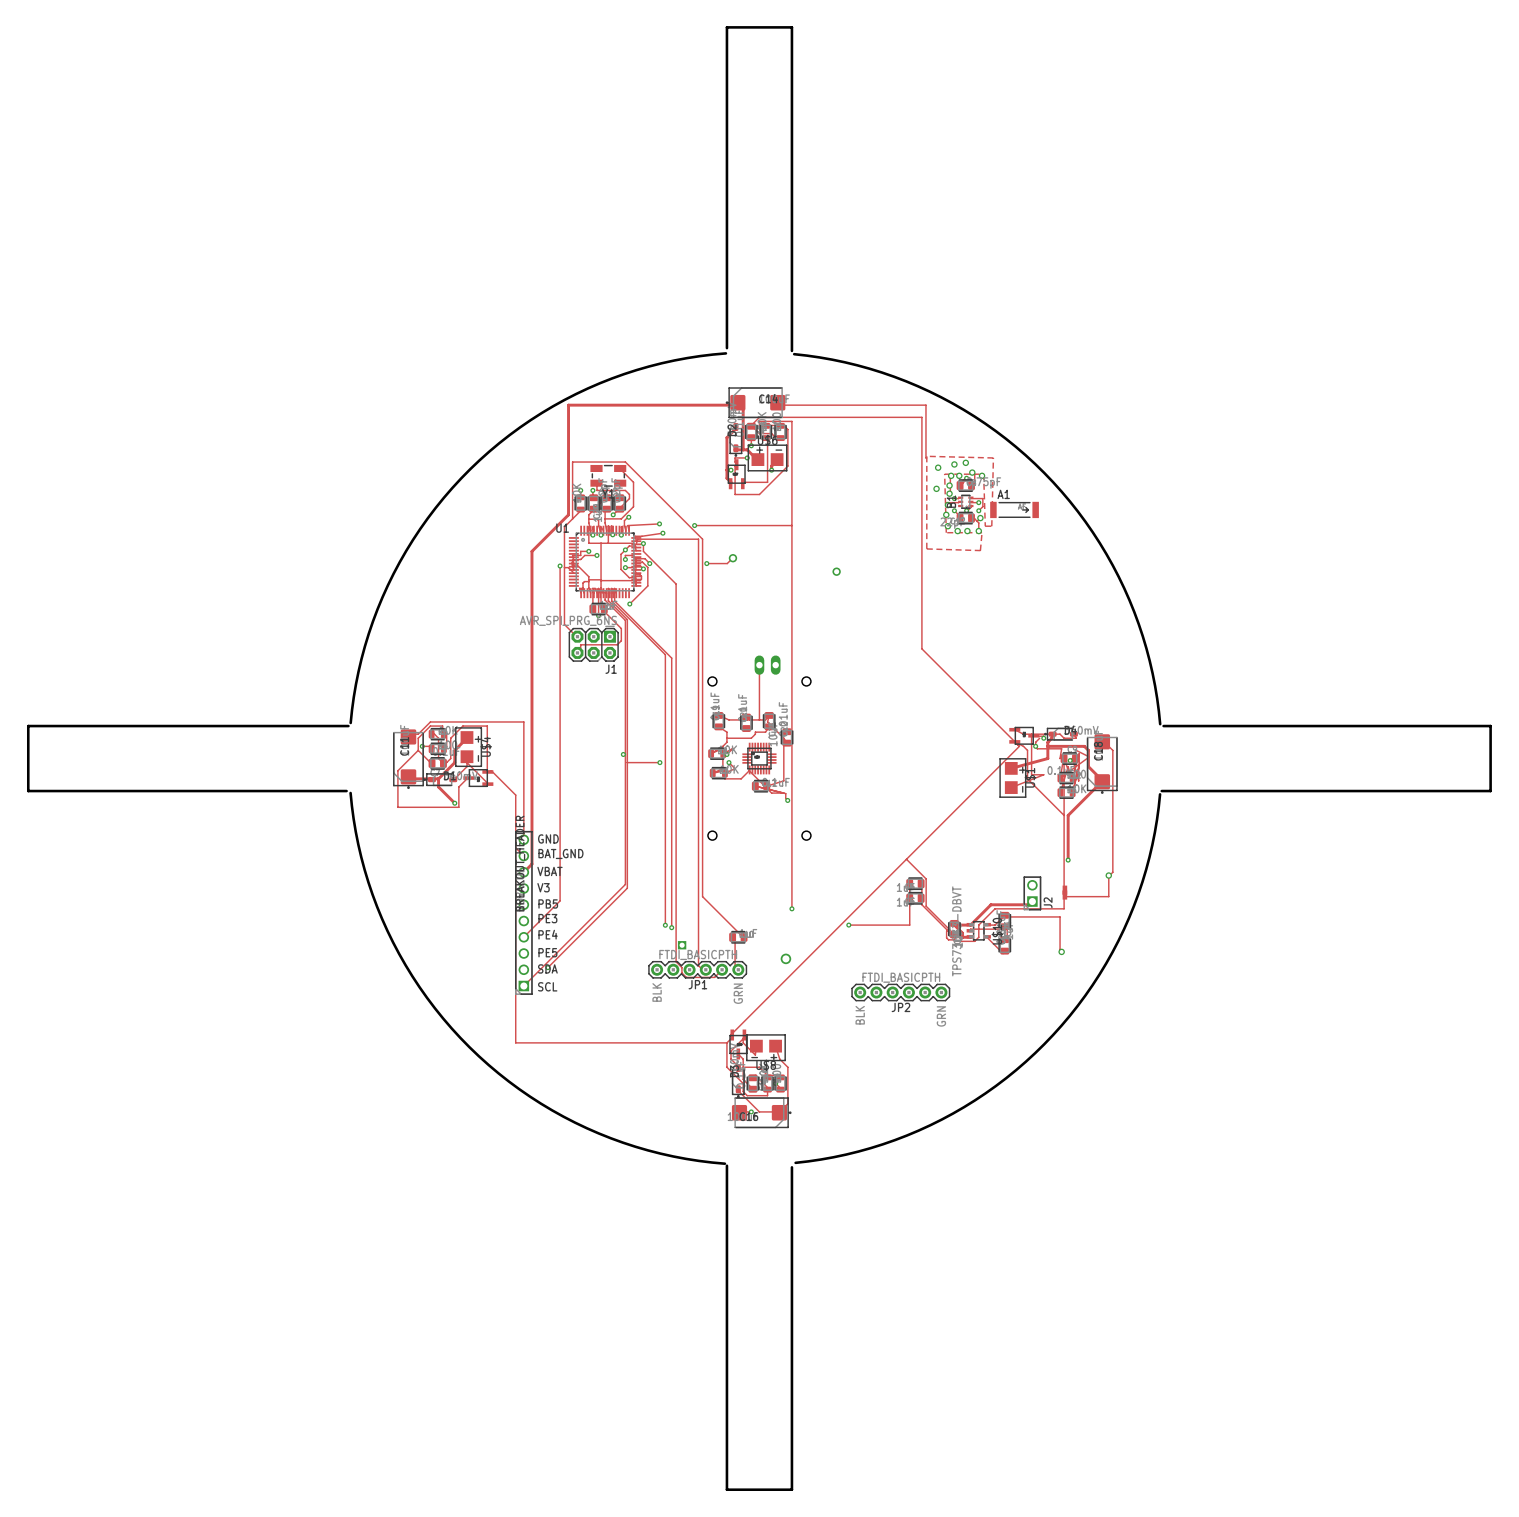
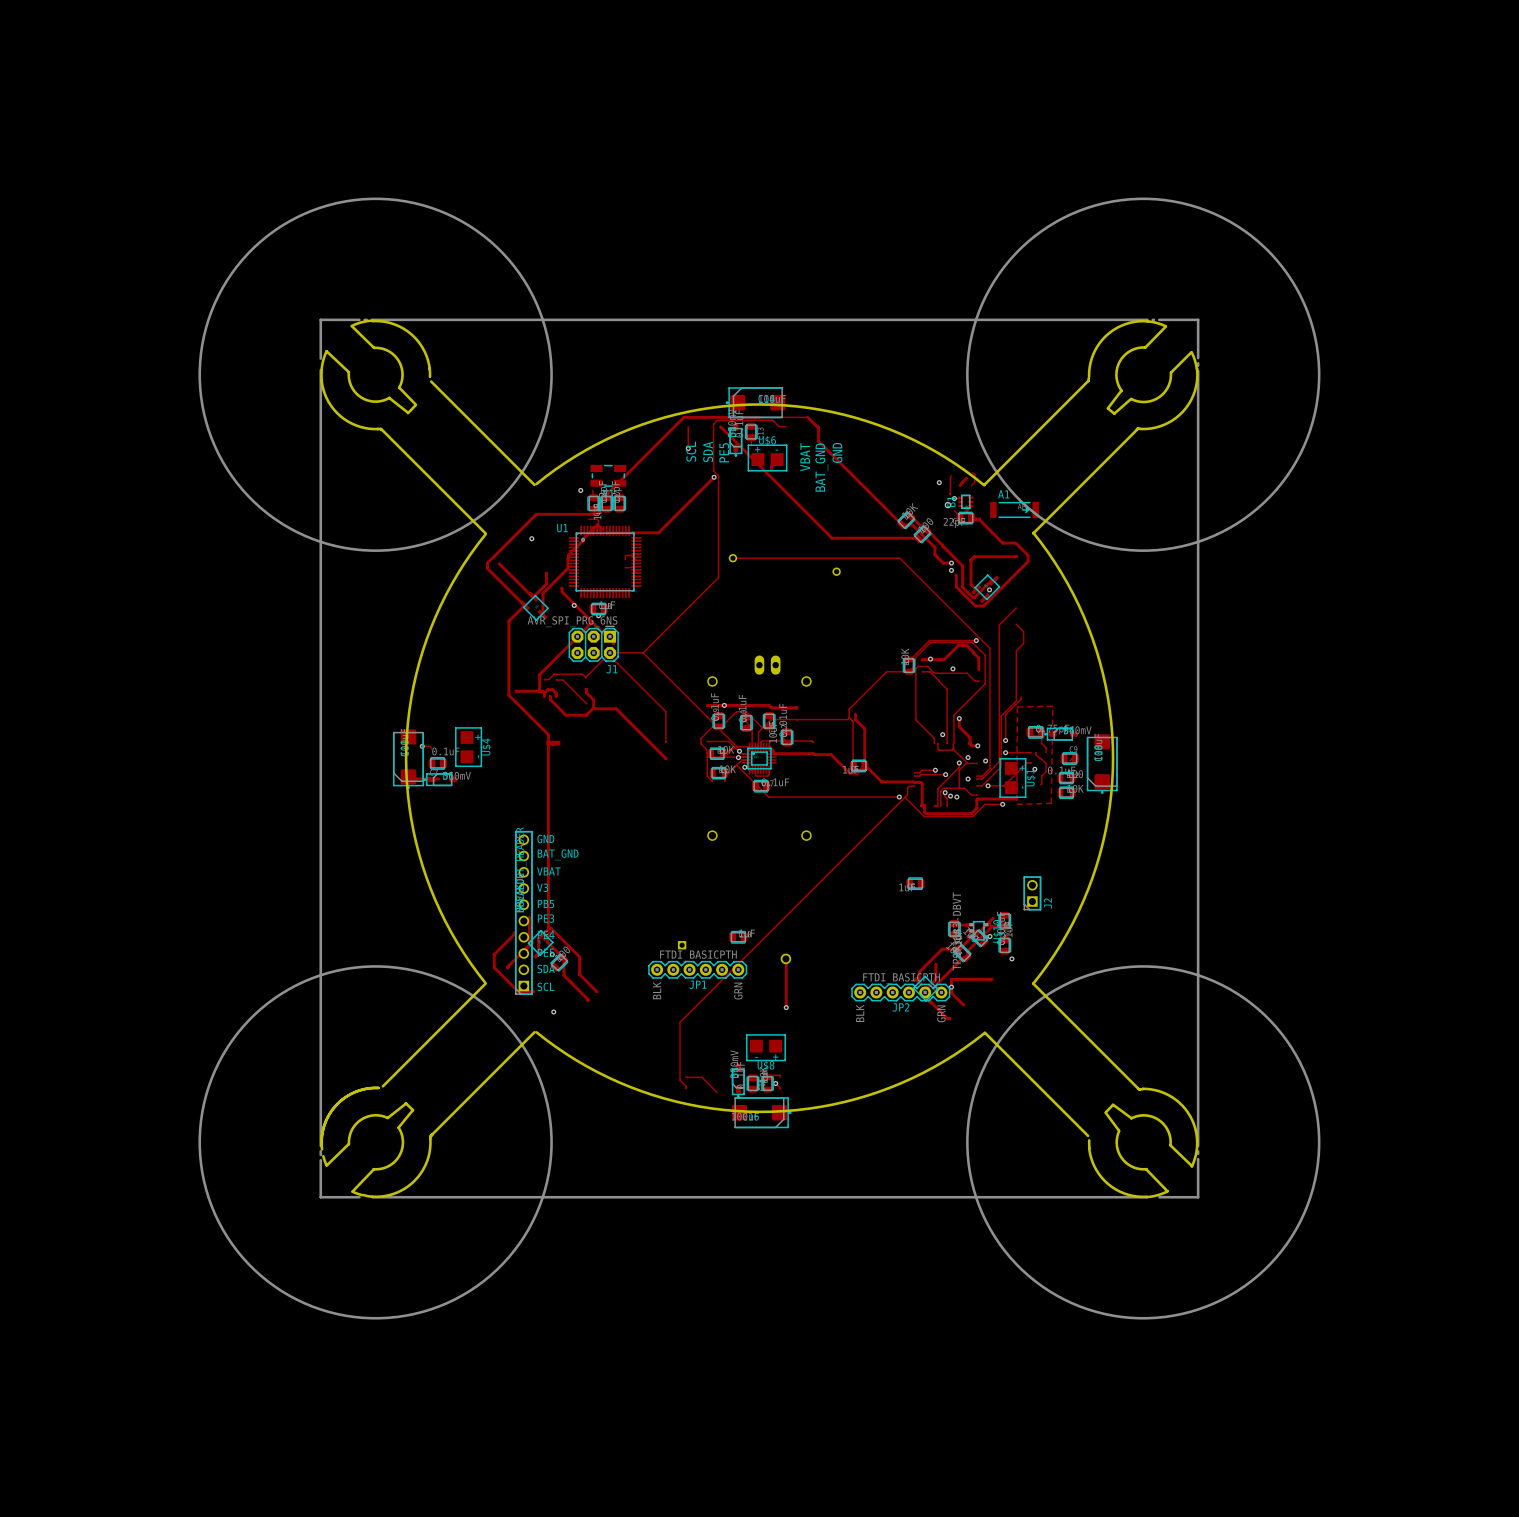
drawing: none -> [198, 197, 553, 552]
drawing: none -> [966, 197, 1321, 552]
line: none -> (359, 319) (320, 319) (320, 358)
line: none -> (364, 319) (366, 319)
line: none -> (371, 319) (1147, 319)
line: none -> (1152, 319) (1154, 319)
line: none -> (1159, 319) (1198, 319) (1198, 358)
board edge: none -> (372, 320) (351, 325)
board edge: none -> (372, 321) (390, 323) (410, 333) (422, 347) (429, 369)
board edge: none -> (1147, 321) (1165, 326)
board edge: none -> (1147, 321) (1125, 324) (1106, 335) (1093, 354) (1089, 376)
board edge: none -> (351, 326) (374, 347)
board edge: none -> (1165, 326) (1145, 347)
board edge: none -> (373, 347) (389, 351) (398, 360) (402, 372) (399, 387)
board edge: none -> (1145, 347) (1129, 351) (1119, 361) (1116, 378) (1121, 390)
board edge: (726, 348) (726, 27) (791, 27) (791, 350) -> none
board edge: none -> (326, 351) (348, 372) (350, 385) (358, 395) (373, 401) (389, 397)
board edge: none -> (326, 351) (321, 369)
board edge: none -> (1191, 352) (1171, 372)
board edge: none -> (1191, 352) (1196, 369)
board edge: (725, 353) (661, 363) (624, 374) (587, 388) (530, 419) (499, 443) (470, 469) (427, 518) (406, 550) (387, 585) (364, 646) (355, 684) (350, 722) -> none
board edge: (794, 354) (832, 359) (869, 368) (929, 391) (963, 409) (995, 431) (1044, 472) (1069, 501) (1092, 532) (1124, 588) (1138, 624) (1149, 660) (1160, 724) -> none
line: none -> (1198, 363) (1198, 365)
board edge: none -> (429, 368) (430, 376)
board edge: none -> (1197, 368) (1194, 391) (1182, 411) (1163, 424) (1140, 429)
line: none -> (320, 370) (320, 1146)
board edge: none -> (321, 370) (321, 381)
line: none -> (1198, 370) (1198, 1146)
board edge: none -> (1170, 372) (1168, 385) (1158, 397) (1143, 402) (1131, 399)
board edge: none -> (1088, 377) (1088, 380)
board edge: none -> (321, 380) (326, 398) (340, 416) (360, 426) (378, 429)
board edge: none -> (431, 381) (534, 484)
board edge: none -> (1088, 381) (984, 484)
board edge: none -> (399, 387) (416, 404)
board edge: none -> (1121, 390) (1107, 408)
board edge: none -> (389, 398) (407, 412)
board edge: none -> (1131, 398) (1114, 413)
track: (777, 402) (779, 405) (925, 405) (926, 457) -> none
board edge: none -> (415, 405) (408, 413)
board edge: none -> (1108, 408) (1114, 413)
track: (759, 417) (751, 425) -> (759, 417) (683, 417) (599, 502) (598, 514) (536, 514) (487, 563) (487, 568) (524, 605) (508, 621) (508, 695) (548, 734) (549, 928)
track: (807, 417) (921, 417) (921, 648) (1019, 746) -> (807, 417) (818, 427) (818, 441) (902, 525) (912, 525) (934, 547) (935, 554) (943, 563) (951, 563)
track: (751, 425) (763, 437) (767, 437) (767, 482) (742, 483) -> none
track: (765, 425) (783, 425) (787, 429) (787, 466) (759, 494) (735, 494) (735, 466) (736, 464) (735, 457) (747, 457) -> none
track: none -> (688, 427) (688, 448)
track: none -> (720, 427) (832, 538) (918, 538)
track: (735, 427) (726, 437) (726, 478) (730, 483) -> none
track: none -> (785, 427) (778, 426) (772, 420) (717, 420) (713, 424) (713, 470) (718, 475) (718, 577) (643, 653)
board edge: none -> (377, 428) (382, 430)
board edge: none -> (1140, 428) (1136, 429)
board edge: none -> (382, 430) (485, 533)
board edge: none -> (1136, 430) (1033, 533)
part rotation: 0° (765, 431) -> 45° counterclockwise (962, 953)
part position: (765, 431) -> (962, 953)
part rotation: 0° (780, 431) -> 45° counterclockwise (979, 938)
part position: (780, 431) -> (979, 938)
track: (780, 438) (775, 437) (771, 433) (763, 433) (759, 429) (759, 421) (791, 421) (791, 908) -> none
via: (751, 445) -> none
via: none -> (688, 448)
track: (735, 448) (735, 449) (747, 449) (757, 459) -> none
track: (743, 449) (743, 409) (737, 402) (735, 405) (568, 405) (568, 514) (531, 551) (531, 864) (523, 872) -> none
text: none -> SCL (691, 451)
text: none -> SDA (708, 451)
text: none -> PE5 (724, 452)
text: none -> GND (837, 452)
zone outline: (926, 456) (993, 457) (991, 526) (985, 526) (983, 474) (944, 474) (946, 532) (982, 532) (980, 550) (926, 548) (926, 456) -> none
via: (747, 457) -> none
text: none -> VBAT (805, 457)
via: (965, 462) -> none
via: (954, 464) -> none
via: (938, 467) -> none
track: (620, 468) (633, 482) (633, 506) (621, 518) (605, 518) -> none
via position: (731, 470) -> (714, 477)
via: (771, 470) -> none
text: none -> BAT_GND (821, 467)
via: (972, 472) -> none
part rotation: 0° (736, 474) -> 45° counterclockwise (927, 990)
part position: (736, 474) -> (927, 990)
via: (951, 475) -> none
via: (959, 475) -> none
via: (982, 475) -> none
track: none -> (714, 477) (658, 532) (606, 532)
via: (966, 478) -> none
via: none -> (939, 482)
board edge: none -> (536, 483) (586, 449) (641, 424) (700, 409) (760, 404) (820, 409) (879, 425) (934, 450) (984, 485)
track: (596, 483) (596, 490) (625, 490) (629, 494) (629, 498) (613, 514) -> none
via: (949, 485) -> none
part position: (965, 485) -> (1035, 732)
via: (936, 488) -> none
via: (592, 490) -> none
via: (949, 493) -> none
track: (619, 497) (605, 498) (588, 514) (590, 530) (588, 527) (588, 543) (633, 543) (636, 547) -> none
track: (970, 497) (982, 498) (982, 506) (978, 510) -> none
track: (960, 501) (946, 502) (947, 505) -> none
track: (970, 501) (978, 502) -> none
via: (978, 502) -> none
part position: (580, 503) -> (909, 665)
track: (580, 509) (564, 527) (564, 624) (577, 636) -> none
track: (606, 509) (605, 510) (606, 530) -> none
via: (954, 510) -> none
via: (966, 510) -> none
via: (978, 510) -> none
via: (613, 514) -> none
via: (946, 514) -> none
track: none -> (910, 515) (962, 566) (962, 587) (972, 597) (991, 580) (993, 580)
track: (628, 517) (624, 520) (625, 530) -> none
via: (628, 517) -> none
track: (572, 518) (572, 462) (625, 462) (702, 539) (702, 896) (744, 937) -> none
track: (971, 518) (978, 522) (978, 531) -> none
track: none -> (975, 518) (978, 519) (1003, 543) (1015, 543) (1028, 555) (1028, 561) (983, 605) (975, 605) (956, 586) (955, 574)
via: (980, 518) -> none
track: (659, 523) (627, 525) (629, 530) -> none
via: (659, 523) -> none
track: none -> (598, 524) (568, 554) (567, 568) (543, 593) (542, 614)
track: (694, 525) (791, 525) -> none
via: (694, 525) -> none
via: (947, 526) -> none
track: (609, 530) (608, 526) (608, 543) -> none
track: (613, 530) (611, 526) (612, 534) -> none
track: (622, 530) (621, 527) (621, 535) -> none
via: (957, 531) -> none
via: (967, 531) -> none
via: (978, 531) -> none
board edge: none -> (1033, 532) (1067, 583) (1092, 638) (1107, 697) (1113, 758) (1107, 818) (1092, 877) (1067, 933) (1033, 983)
track: (662, 533) (635, 536) (636, 541) -> none
via: (662, 533) -> none
board edge: none -> (485, 534) (451, 584) (426, 639) (411, 698) (406, 758) (411, 818) (426, 877) (451, 932) (485, 982)
via: (612, 534) -> none
via: (592, 535) -> none
via: (601, 535) -> none
via: (621, 535) -> none
via: none -> (531, 538)
track: (601, 543) (601, 579) -> none
track: (643, 543) (643, 551) (676, 584) (676, 961) (681, 967) (681, 973) (686, 977) (714, 977) (722, 969) -> none
via: (643, 543) -> none
track: (636, 544) (637, 539) (698, 539) (698, 965) (702, 969) (705, 969) -> none
via: (625, 549) -> none
track: (636, 550) (634, 546) (629, 546) (621, 554) (621, 569) (629, 577) (634, 577) (636, 582) -> none
track: (588, 551) (580, 551) (580, 555) (572, 555) (573, 560) -> none
via: (588, 551) -> none
track: (596, 555) (584, 555) (580, 559) (572, 559) (573, 563) -> none
via: (596, 555) -> none
track: none -> (1016, 556) (974, 556) (970, 559) (970, 584) (976, 589)
track: (732, 558) (727, 563) (706, 563) -> (732, 558) (899, 558) (990, 648) (990, 768) (982, 776) (976, 776)
via: (625, 559) -> none
track: none -> (499, 563) (532, 596) (546, 584) (546, 573)
track: (636, 563) (635, 558) (644, 558) (649, 563) -> none
via: (649, 563) -> none
via: (706, 563) -> none
via: none -> (951, 563)
track: (560, 566) (560, 900) (523, 937) -> none
via: (560, 566) -> none
track: (573, 566) (572, 562) (572, 565) (573, 569) (572, 565) (577, 565) (588, 576) (590, 593) -> none
track: (636, 566) (635, 562) (642, 562) (647, 567) (647, 585) (629, 604) -> none
track: (564, 567) (568, 567) (573, 573) -> none
via: (625, 567) -> none
track: (643, 568) (640, 565) (635, 565) (636, 569) -> none
via: (643, 568) -> none
via: none -> (951, 570)
track: (588, 579) (601, 579) -> none
track: (601, 579) (603, 593) (601, 592) (601, 608) (604, 609) (605, 612) (621, 628) (621, 640) (617, 644) (580, 644) (580, 652) (577, 652) -> none
track: (636, 579) (635, 574) (641, 576) (640, 580) (635, 580) (636, 585) (634, 580) (601, 580) -> none
track: (588, 581) (582, 583) (584, 593) (582, 588) (579, 588) (581, 593) -> none
track: none -> (561, 588) (562, 591) (613, 643)
via: none -> (989, 589)
track: (597, 593) (595, 588) (592, 588) (592, 609) -> none
track: (600, 593) (598, 588) (598, 615) -> none
track: (606, 593) (605, 592) (605, 600) (625, 620) (625, 884) (523, 986) -> none
track: (609, 593) (608, 588) (608, 600) (627, 619) (627, 888) (547, 967) -> none
track: (613, 593) (611, 588) (611, 601) (665, 654) (665, 925) -> none
track: (616, 593) (614, 588) (614, 601) (671, 658) (671, 927) -> none
via: (629, 604) -> none
via: none -> (574, 605)
track: none -> (1016, 608) (999, 624) (999, 761) (982, 779) (976, 779)
track: none -> (592, 622) (539, 674) (539, 691)
track: none -> (1016, 624) (1023, 631) (1023, 643) (1016, 650) (1016, 701) (1001, 716) (1001, 766) (982, 785) (976, 785)
track: none -> (976, 640) (929, 640) (909, 659)
via: none -> (976, 640)
track: none -> (613, 659) (665, 711) (666, 742)
via: none -> (930, 659)
track: none -> (922, 660) (944, 659) (958, 645) (966, 645) (978, 658) (978, 669)
track: (759, 665) (759, 719) -> none
via: none -> (952, 668)
track: none -> (922, 671) (930, 671) (947, 689) (947, 743)
track: none -> (544, 679) (548, 679) (554, 674) (582, 674) (586, 677) (610, 652) (642, 652) (737, 746) (749, 747)
track: none -> (556, 679) (563, 680) (586, 703)
track: none -> (978, 681) (974, 681) (967, 673) (934, 673) (927, 666) (917, 666) (915, 668) (915, 720) (934, 738) (934, 743)
track: none -> (586, 689) (586, 692) (593, 700) (593, 707)
track: none -> (516, 691) (542, 691) (544, 693)
track: none -> (544, 693) (544, 696)
track: none -> (544, 693) (547, 689) (552, 689) (556, 696)
track: none -> (550, 696) (550, 699) (565, 715) (586, 715) (593, 707)
track: none -> (1021, 697) (1005, 714) (1005, 740)
track: none -> (707, 705) (769, 705) (771, 707) (797, 708)
via: none -> (724, 705)
zone outline: none -> (1052, 706) (1051, 803) (1016, 804) (1017, 707) (1052, 706)
track: none -> (593, 707) (616, 708) (666, 758)
track: none -> (855, 714) (855, 719) (864, 728) (864, 765)
track: (718, 715) (728, 719) (747, 719) (746, 717) (749, 719) (765, 719) (769, 715) (767, 721) (783, 738) (783, 780) (766, 786) -> none
track: none -> (741, 716) (752, 727) (752, 747)
track: none -> (849, 717) (847, 719) (771, 719) (769, 716) (771, 719) (758, 732) (758, 746) (755, 747)
track: none -> (959, 718) (959, 726) (970, 737) (970, 743) (977, 745)
via: none -> (959, 718)
track: none -> (714, 724) (700, 738) (700, 743) (706, 749) (707, 776) (712, 781)
board edge: (348, 726) (28, 726) (28, 791) (346, 791) -> none
track: (718, 726) (726, 732) (726, 742) (711, 753) (722, 748) (722, 768) (712, 773) (724, 770) (724, 778) (741, 778) (749, 770) (771, 793) (783, 793) (755, 786) (785, 793) (787, 800) -> none
track: (769, 726) (765, 732) (755, 732) (751, 738) (726, 738) -> none
board edge: (1163, 726) (1490, 726) (1490, 791) (1161, 791) -> none
track: none -> (762, 728) (746, 711) (736, 711) (719, 729)
track: (1014, 729) (1023, 734) (1060, 734) (1064, 738) (1076, 738) (1073, 734) -> none
track: none -> (1041, 732) (1041, 743) (1046, 747) (1046, 752)
track: (431, 734) (438, 738) (438, 758) (443, 763) (450, 758) (450, 738) (462, 726) (487, 726) (487, 770) (491, 770) (515, 795) (515, 1042) (726, 1042) -> none
part rotation: 0° (437, 734) -> 45° counterclockwise (906, 520)
part position: (437, 734) -> (906, 520)
via: none -> (942, 734)
track: (1031, 734) (1031, 774) (1043, 774) (1011, 787) -> none
track: (1052, 734) (1047, 742) (1047, 758) (1011, 768) -> none
part rotation: 0° (1024, 735) -> 45° clockwise (533, 605)
part position: (1024, 735) -> (533, 605)
track: (408, 736) (410, 734) (418, 734) (430, 721) (523, 721) (523, 839) -> none
track: (466, 737) (454, 750) (454, 762) (438, 778) (438, 786) (454, 803) -> none
track: (1039, 738) (1035, 742) (1037, 748) (1061, 748) (1060, 758) (1064, 754) (1060, 778) (1089, 756) (1076, 750) -> none
via: (1043, 738) -> none
via: none -> (1005, 740)
track: none -> (707, 741) (728, 741) (741, 754) (746, 754)
track: (1102, 741) (1112, 750) (1112, 872) (1108, 876) -> none
track: none -> (813, 742) (762, 741) (760, 747)
part: none -> (553, 743)
track: none -> (937, 743) (939, 750) (953, 748) (953, 715) (985, 683) (985, 655) (972, 642) (930, 642) (915, 657) (915, 664) (909, 671) (886, 671) (849, 709) (849, 717) (853, 721) (853, 765)
via: none -> (977, 745)
track: (1019, 746) (731, 1034) (731, 1038) (726, 1042) -> none
track: (1019, 746) (1014, 741) (1027, 750) (1027, 778) (1064, 815) -> none
via: (1035, 746) -> none
track: (1047, 746) (1084, 746) (1088, 750) (1088, 766) (1102, 781) (1068, 815) (1068, 860) -> none
track: none -> (769, 747) (773, 753) (831, 754) (849, 773) (857, 773) (864, 765) (881, 781) (920, 782) (921, 805)
part rotation: 0° (437, 748) -> 45° counterclockwise (922, 534)
part position: (437, 748) -> (922, 534)
track: (443, 748) (446, 746) (446, 734) (442, 734) (442, 726) (430, 726) (418, 738) (418, 750) -> none
track: none -> (953, 749) (967, 763) (976, 763)
track: (418, 750) (432, 763) -> none
track: (418, 750) (397, 770) (397, 807) (458, 807) (458, 786) (468, 778) -> none
via: none -> (739, 751)
via: none -> (1005, 752)
track: none -> (1031, 752) (1005, 752)
track: none -> (1035, 752) (1046, 763) (1046, 771) (1041, 776) (1041, 784)
via: (623, 754) -> none
via: (726, 754) -> none
track: (466, 756) (466, 766) (453, 779) -> none
track: none -> (707, 757) (746, 757)
via: none -> (738, 757)
via: none -> (968, 757)
track: (1075, 758) (1072, 758) (1078, 780) (1078, 766) (1072, 792) (1079, 766) (1079, 753) (1072, 778) -> none
track: none -> (746, 760) (741, 760) (724, 777) (724, 781)
via: none -> (985, 760)
via: (1070, 760) -> none
track: (466, 762) (487, 784) -> none
track: (627, 762) (659, 762) -> none
via: (659, 762) -> none
track: (728, 762) (735, 768) (724, 773) -> none
via: (728, 762) -> none
track: none -> (746, 762) (749, 769) (755, 770) (756, 776) (767, 776) (769, 769)
track: none -> (959, 762) (959, 767) (937, 788) (937, 805) (934, 805)
via: none -> (959, 762)
track: none -> (966, 762) (959, 770) (959, 788)
track: none -> (1031, 762) (1027, 762) (1004, 785) (988, 785)
track: none -> (736, 765) (768, 797) (899, 797)
via: none -> (744, 767)
via: none -> (1034, 769)
track: none -> (935, 770) (922, 770) (914, 773)
via: none -> (935, 770)
track: none -> (945, 774) (914, 776)
via: none -> (945, 774)
part rotation: 0° (478, 778) -> 135° clockwise (985, 589)
part position: (478, 778) -> (985, 589)
via: none -> (968, 779)
track: none -> (914, 785) (907, 787) (907, 794) (679, 1022) (679, 1080) (686, 1088)
via: none -> (988, 785)
track: none -> (945, 792) (947, 805)
via: none -> (945, 792)
track: (1060, 792) (1068, 766) (1071, 778) (1064, 758) (1064, 782) (1064, 888) (1064, 890) -> none
board edge: (350, 793) (355, 831) (364, 869) (387, 930) (419, 987) (443, 1018) (469, 1047) (519, 1089) (552, 1110) (586, 1128) (623, 1142) (660, 1153) (724, 1163) -> none
board edge: (1160, 794) (1154, 832) (1146, 869) (1123, 929) (1092, 985) (1069, 1015) (1044, 1044) (1016, 1070) (985, 1093) (930, 1125) (894, 1140) (858, 1151) (795, 1162) -> none
track: none -> (976, 795) (971, 795) (964, 788) (943, 788) (940, 791) (940, 805)
via: none -> (950, 796)
via: none -> (899, 797)
track: none -> (904, 797) (924, 816) (972, 816) (985, 804) (1002, 804)
via: none -> (956, 797)
track: none -> (1016, 799) (977, 799) (976, 808) (971, 813) (926, 813) (924, 805) (921, 805)
via: (787, 800) -> none
via: (454, 803) -> none
via: none -> (1002, 804)
track: (906, 859) (926, 878) (926, 906) (954, 934) -> none
via: (1068, 860) -> none
track: (1108, 875) (1108, 896) (1064, 896) -> none
via: (1108, 875) -> none
track: (909, 883) (909, 925) (848, 925) -> none
track: (921, 883) (921, 904) (950, 933) -> none
part: (1064, 892) -> none
track: (1064, 896) (1064, 908) (995, 908) (978, 925) (978, 937) (974, 941) (954, 941) (954, 937) -> none
part position: (915, 898) -> (859, 765)
track: (1032, 901) (1031, 904) (990, 904) (970, 924) -> none
via: (791, 908) -> none
track: none -> (529, 917) (529, 945) (507, 968)
track: none -> (1001, 917) (1001, 926) (991, 926) (967, 951) (966, 957) (963, 957) (936, 984) (936, 990)
track: none -> (993, 918) (960, 948) (942, 949) (919, 972) (918, 981)
track: (954, 923) (962, 933) (962, 937) (970, 936) -> none
track: (987, 924) (995, 925) (1004, 915) (1007, 916) (1060, 916) (1060, 949) (1061, 951) -> none
via: (665, 925) -> none
via: (848, 925) -> none
via: (671, 927) -> none
track: none -> (549, 928) (538, 938) (538, 953)
track: none -> (549, 928) (579, 956) (579, 974) (596, 991)
track: (947, 930) (946, 937) (954, 939) -> none
track: (970, 930) (970, 929) (1003, 929) (1004, 926) (1007, 929) (1007, 937) (1004, 939) -> none
track: none -> (514, 932) (493, 954) (494, 967) (518, 991) (533, 991)
track: none -> (547, 936) (547, 942) (563, 958) (563, 975) (588, 1000)
track: (987, 936) (1003, 953) (1004, 951) -> none
via: none -> (990, 936)
track: (732, 937) (735, 937) (735, 969) (738, 969) -> none
via: (1061, 951) -> none
track: none -> (785, 958) (786, 1007)
via: none -> (1011, 958)
track: none -> (936, 964) (935, 979) (928, 987) (927, 999) (947, 1018) (949, 1018)
drawing: none -> [198, 965, 553, 1320]
drawing: none -> [966, 965, 1321, 1320]
via position: (547, 967) -> (552, 954)
track: none -> (991, 979) (951, 979) (951, 993) (963, 1004)
board edge: none -> (485, 983) (382, 1086)
board edge: none -> (1033, 983) (1137, 1088)
via: none -> (951, 987)
via: none -> (786, 1007)
via: none -> (553, 1012)
board edge: none -> (534, 1032) (432, 1134)
board edge: none -> (536, 1032) (586, 1066) (641, 1091) (699, 1106) (759, 1111) (820, 1106) (878, 1091) (933, 1067) (983, 1033)
board edge: none -> (984, 1032) (1088, 1135)
track: (743, 1038) (743, 1042) (755, 1055) (756, 1046) -> none
track: (743, 1038) (731, 1051) (731, 1059) (738, 1067) -> none
track: (726, 1042) (726, 1067) (743, 1083) (743, 1091) (747, 1095) (767, 1095) (767, 1087) (755, 1075) (752, 1077) -> none
part rotation: 0° (738, 1044) -> 135° counterclockwise (538, 944)
part position: (738, 1044) -> (538, 944)
track: (775, 1046) (779, 1059) (787, 1067) (787, 1103) (779, 1112) (759, 1111) (738, 1089) -> none
track: (738, 1054) (743, 1059) (743, 1079) (752, 1089) -> none
track: (743, 1067) (759, 1067) (767, 1077) -> none
track: none -> (686, 1077) (701, 1077) (716, 1092)
part rotation: 0° (780, 1083) -> 45° clockwise (559, 962)
part position: (780, 1083) -> (559, 962)
board edge: none -> (1138, 1088) (1142, 1089)
board edge: none -> (1142, 1088) (1160, 1091) (1179, 1102) (1192, 1120) (1196, 1137)
board edge: none -> (405, 1103) (412, 1110)
board edge: none -> (406, 1103) (387, 1117)
board edge: none -> (1113, 1104) (1131, 1118)
board edge: none -> (1112, 1105) (1106, 1112)
board edge: none -> (412, 1110) (398, 1127)
via: (751, 1111) -> none
board edge: none -> (1105, 1112) (1118, 1130)
board edge: none -> (387, 1118) (375, 1115) (360, 1119) (351, 1131) (348, 1144)
board edge: none -> (1131, 1118) (1147, 1115) (1159, 1120) (1168, 1132) (1170, 1145)
board edge: none -> (398, 1127) (402, 1140) (399, 1156) (386, 1167) (373, 1169)
board edge: none -> (1119, 1130) (1116, 1143) (1121, 1158) (1131, 1166) (1146, 1169)
board edge: none -> (431, 1134) (430, 1138)
board edge: none -> (430, 1138) (426, 1161) (414, 1180) (395, 1193) (372, 1196)
board edge: none -> (1197, 1138) (1196, 1152) (1191, 1166)
board edge: none -> (1089, 1140) (1089, 1148)
board edge: none -> (348, 1143) (326, 1165)
board edge: none -> (321, 1145) (321, 1141) (321, 1136) (322, 1132) (323, 1127) (324, 1123) (326, 1119) (328, 1115) (331, 1111) (334, 1107) (337, 1104) (340, 1101) (344, 1098) (347, 1095) (351, 1093) (356, 1091) (360, 1090) (364, 1089) (369, 1088) (373, 1087) (378, 1087) (373, 1087) (368, 1088) (364, 1089) (359, 1090) (355, 1092) (350, 1094) (346, 1096) (342, 1099) (339, 1102) (335, 1105) (332, 1109) (330, 1113) (327, 1117) (325, 1121) (324, 1125) (322, 1130) (322, 1135) (321, 1139) (321, 1144) (322, 1149)
board edge: none -> (1170, 1145) (1192, 1166)
board edge: none -> (1089, 1148) (1096, 1170) (1108, 1184) (1124, 1193) (1146, 1196)
line: none -> (320, 1151) (320, 1155)
line: none -> (1198, 1151) (1198, 1153)
board edge: none -> (323, 1156) (326, 1165)
line: none -> (1198, 1159) (1198, 1197) (1159, 1197)
line: none -> (320, 1160) (320, 1197) (359, 1197)
board edge: (726, 1165) (726, 1489) (791, 1489) (791, 1167) -> none
board edge: none -> (373, 1169) (352, 1191)
board edge: none -> (1146, 1169) (1167, 1191)
board edge: none -> (352, 1191) (361, 1195)
board edge: none -> (1167, 1191) (1146, 1197)
board edge: none -> (363, 1195) (371, 1196)
line: none -> (372, 1197) (1147, 1197)

